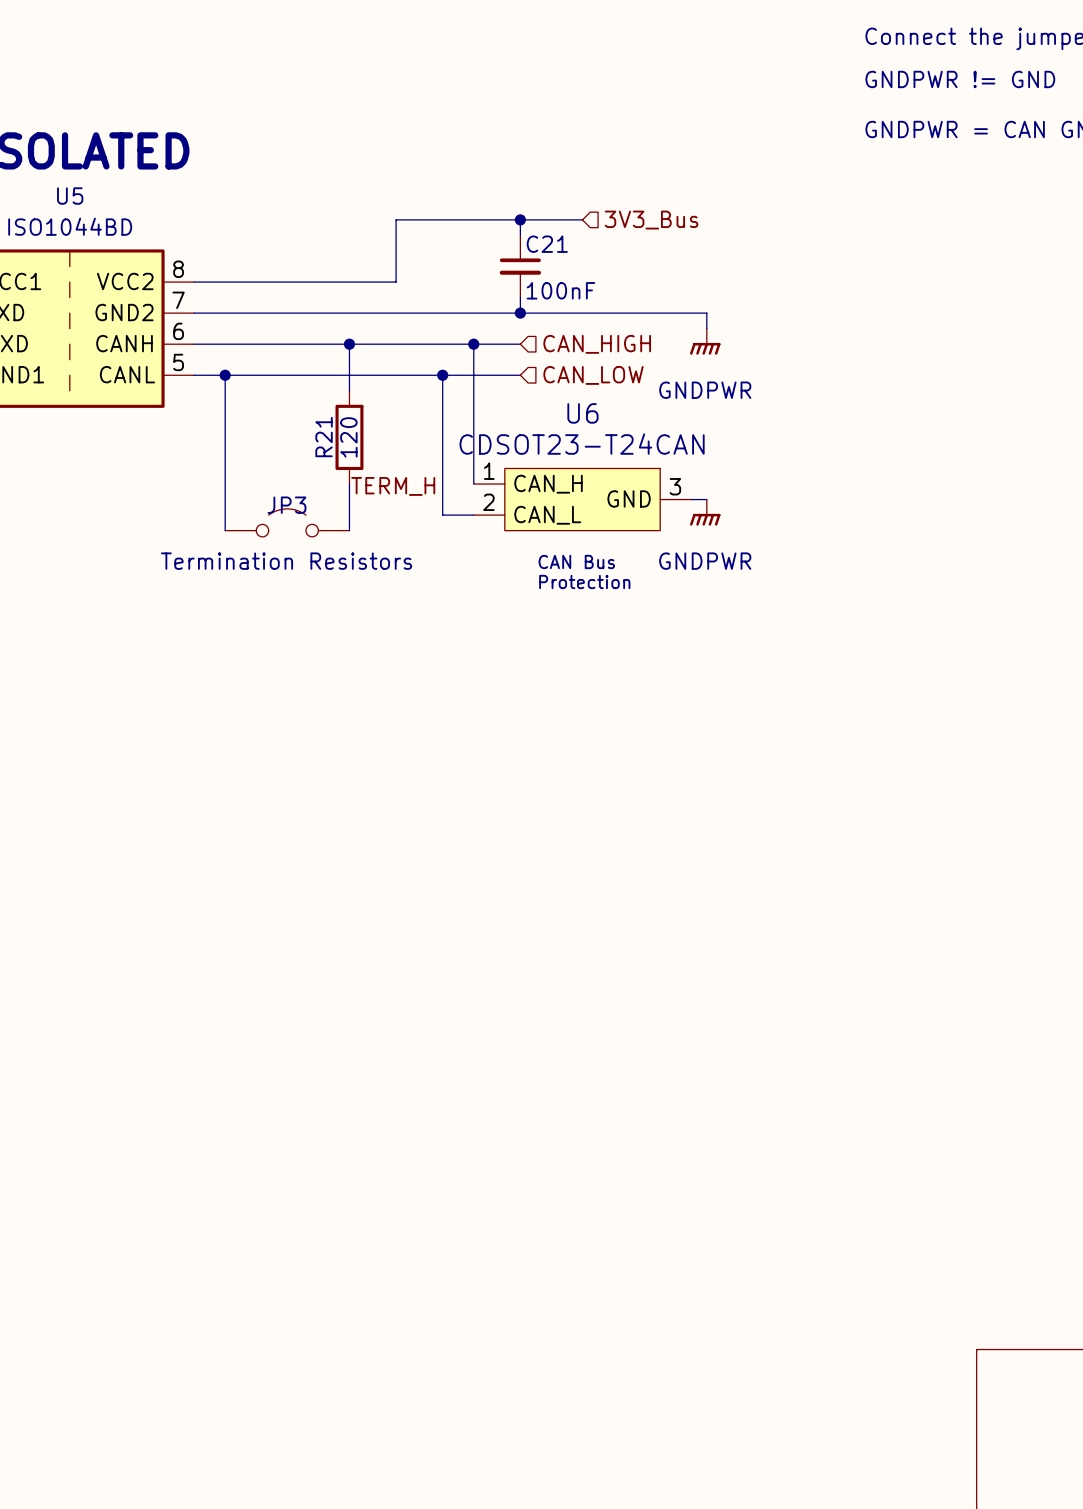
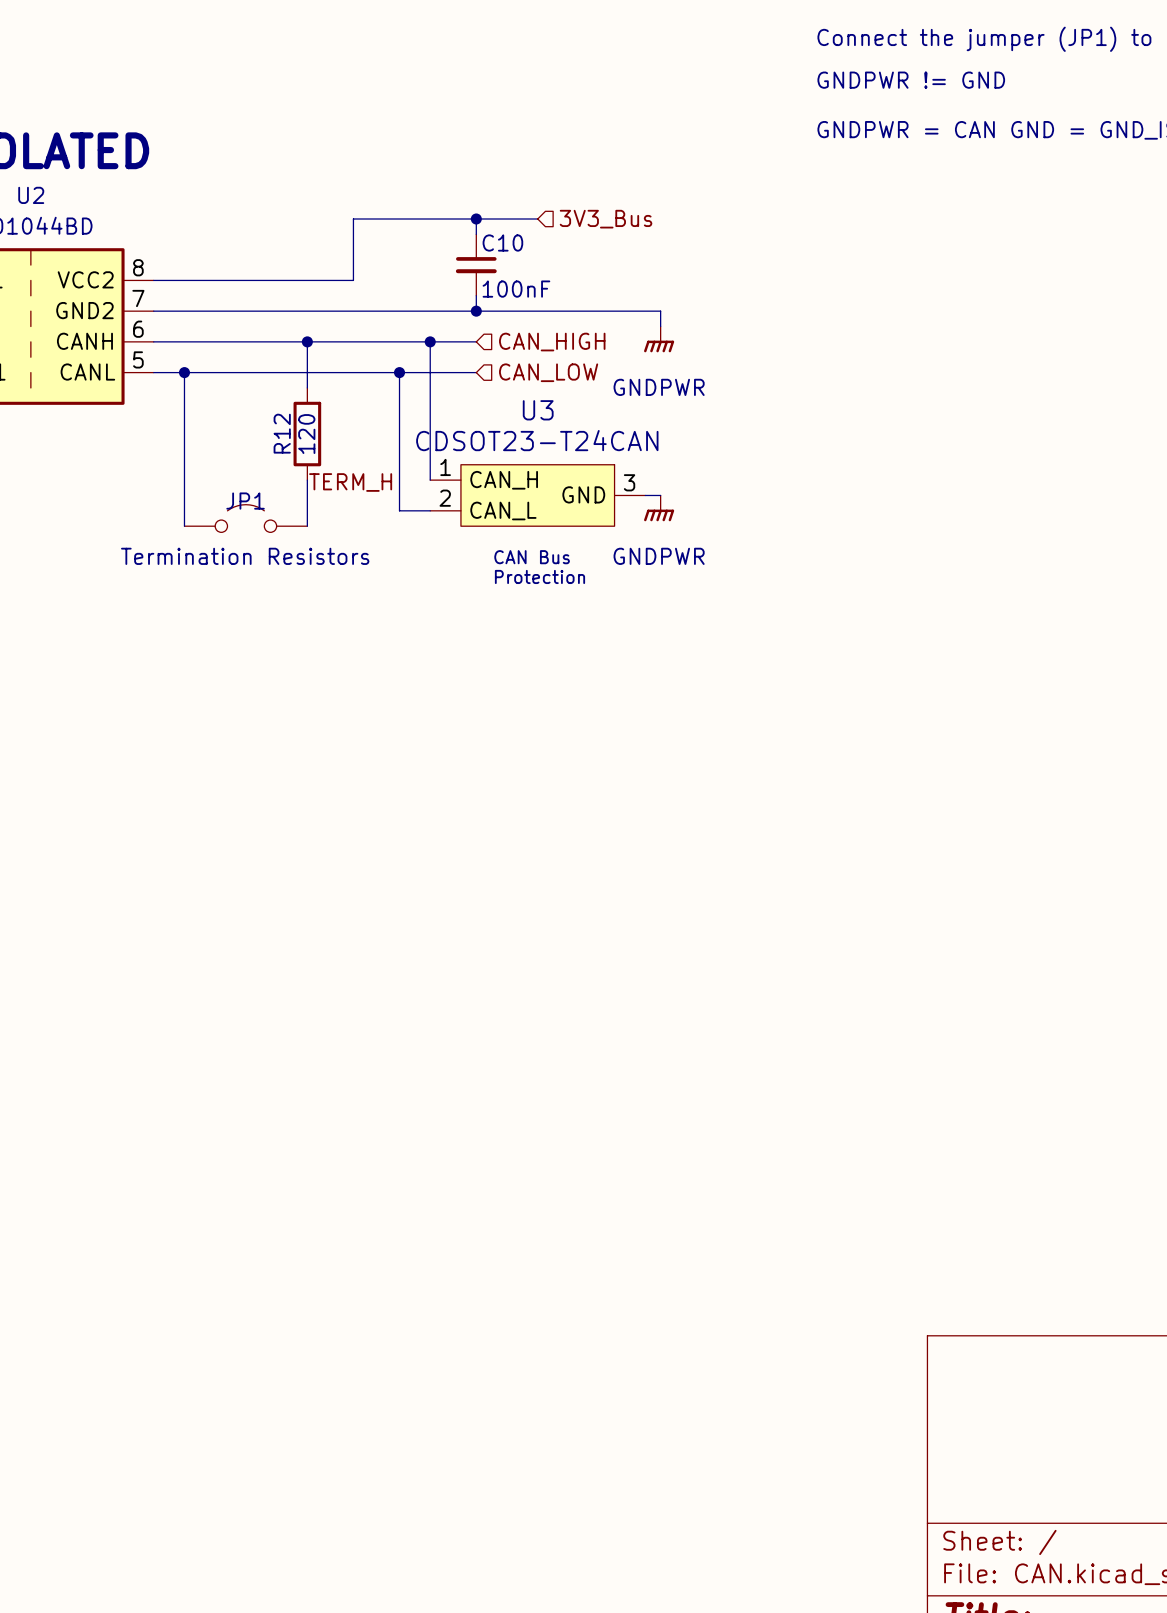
U5 name: U5 (70, 196) -> U2 (31, 195)
C21 name: C21 (547, 244) -> C10 (502, 243)
U6 name: U6 (582, 413) -> U3 (538, 410)
R21 name: R21 (324, 437) -> R12 (282, 433)
JP3 name: JP3 (286, 505) -> JP1 (245, 501)

